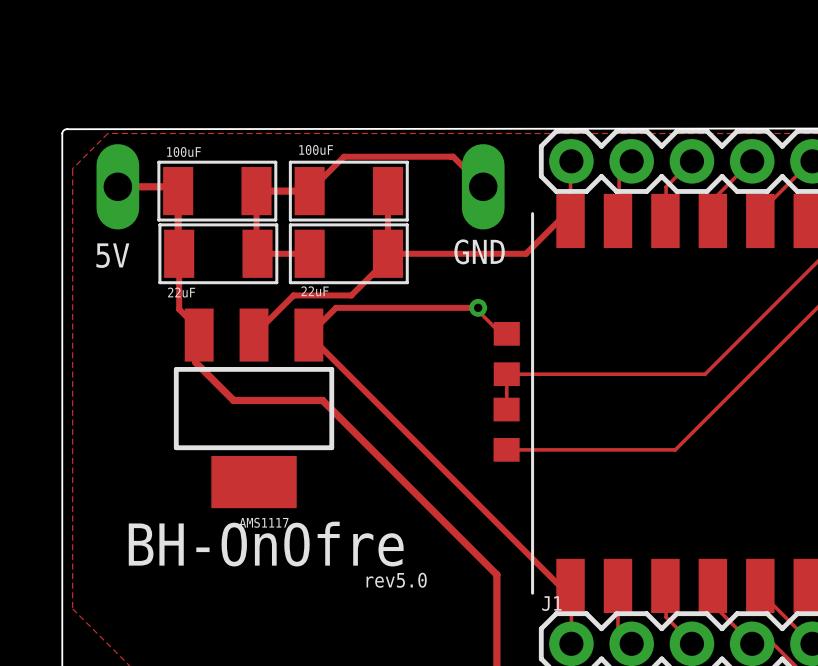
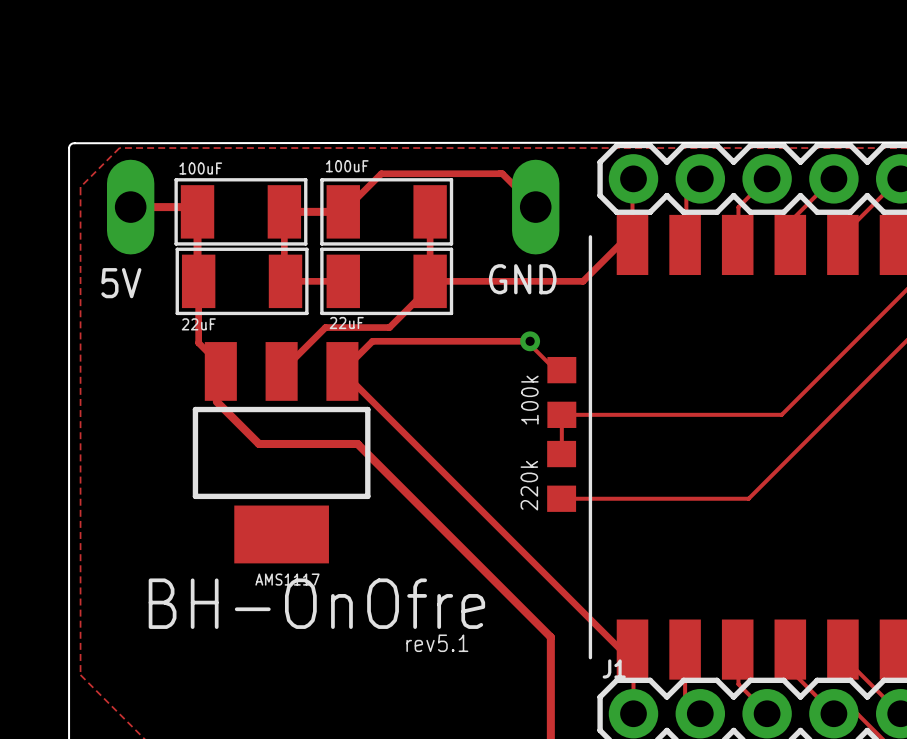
part value: none -> 100k (529, 400)
part value: none -> 220k (529, 485)
text: rev5.0 (396, 580) -> rev5.1 (437, 643)

